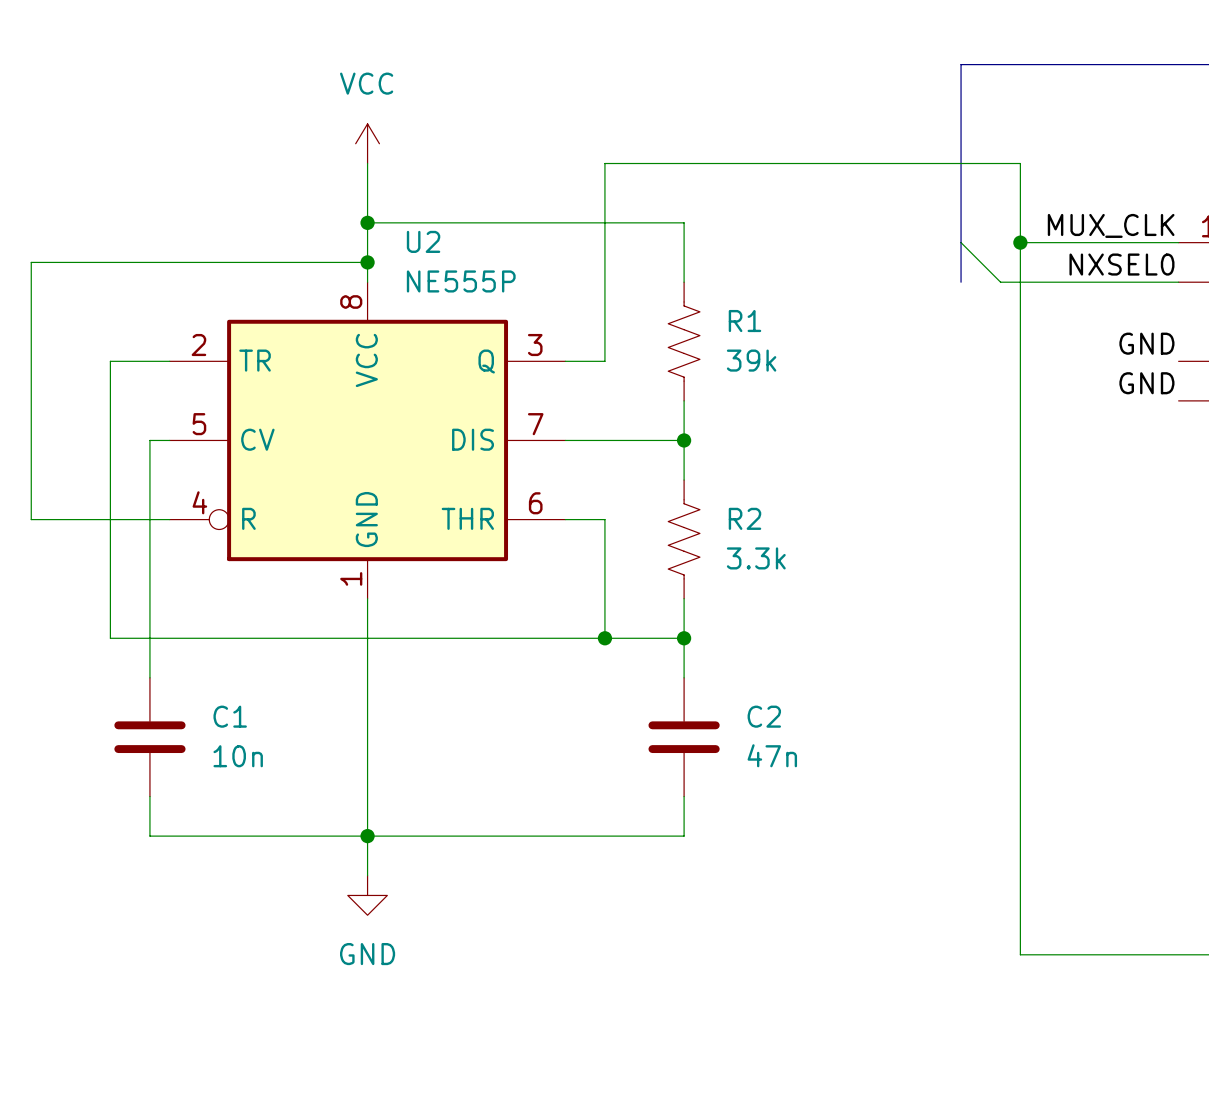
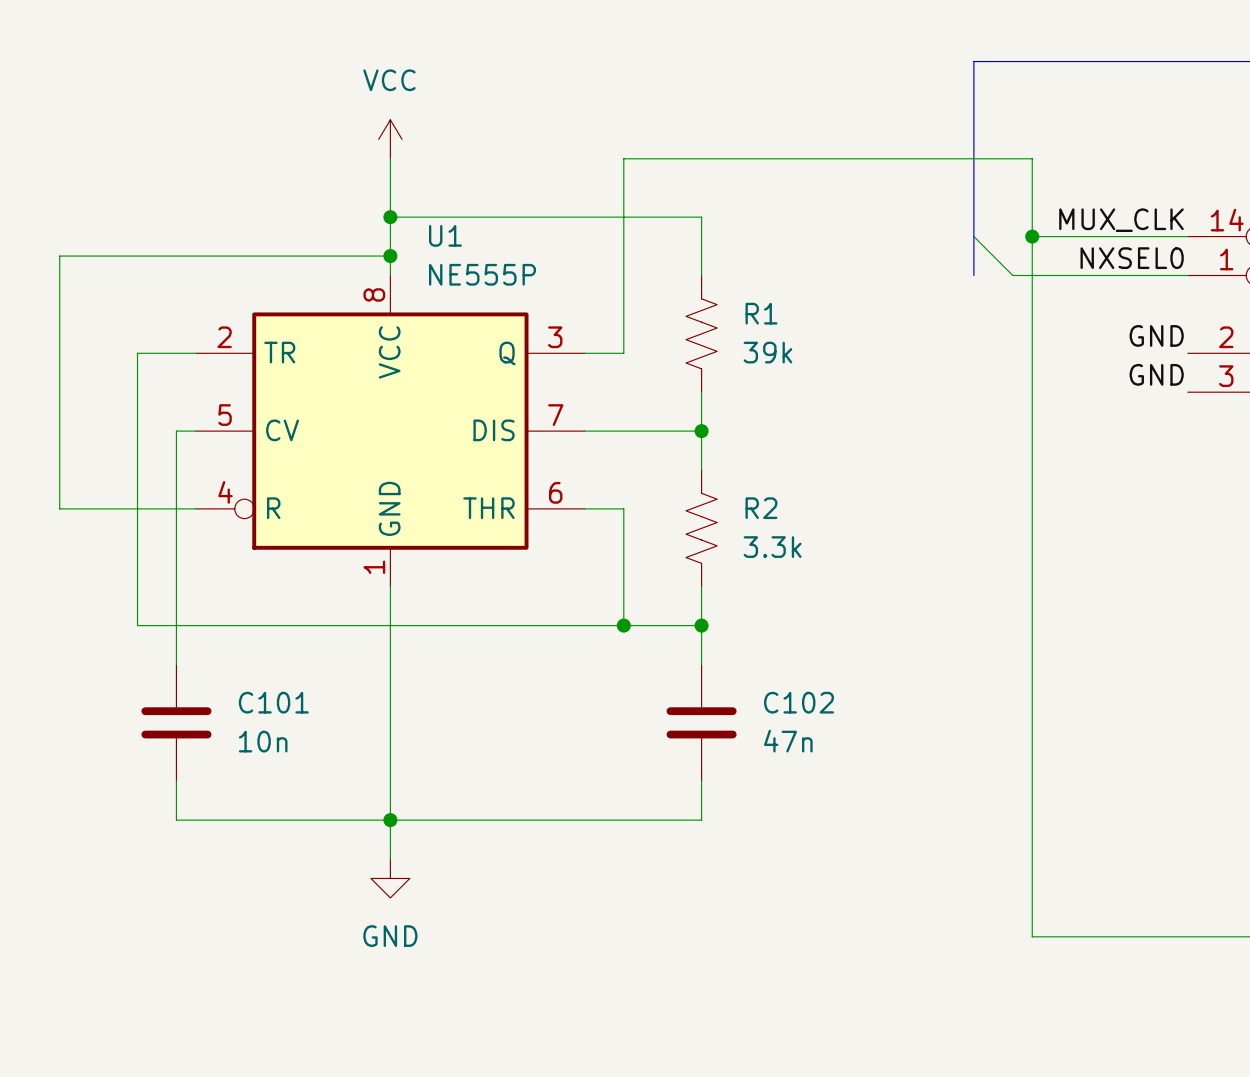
U2 name: U2 (423, 241) -> U1 (445, 235)
C1 name: C1 (230, 716) -> C101 (273, 702)
C2 name: C2 (764, 716) -> C102 (798, 702)

